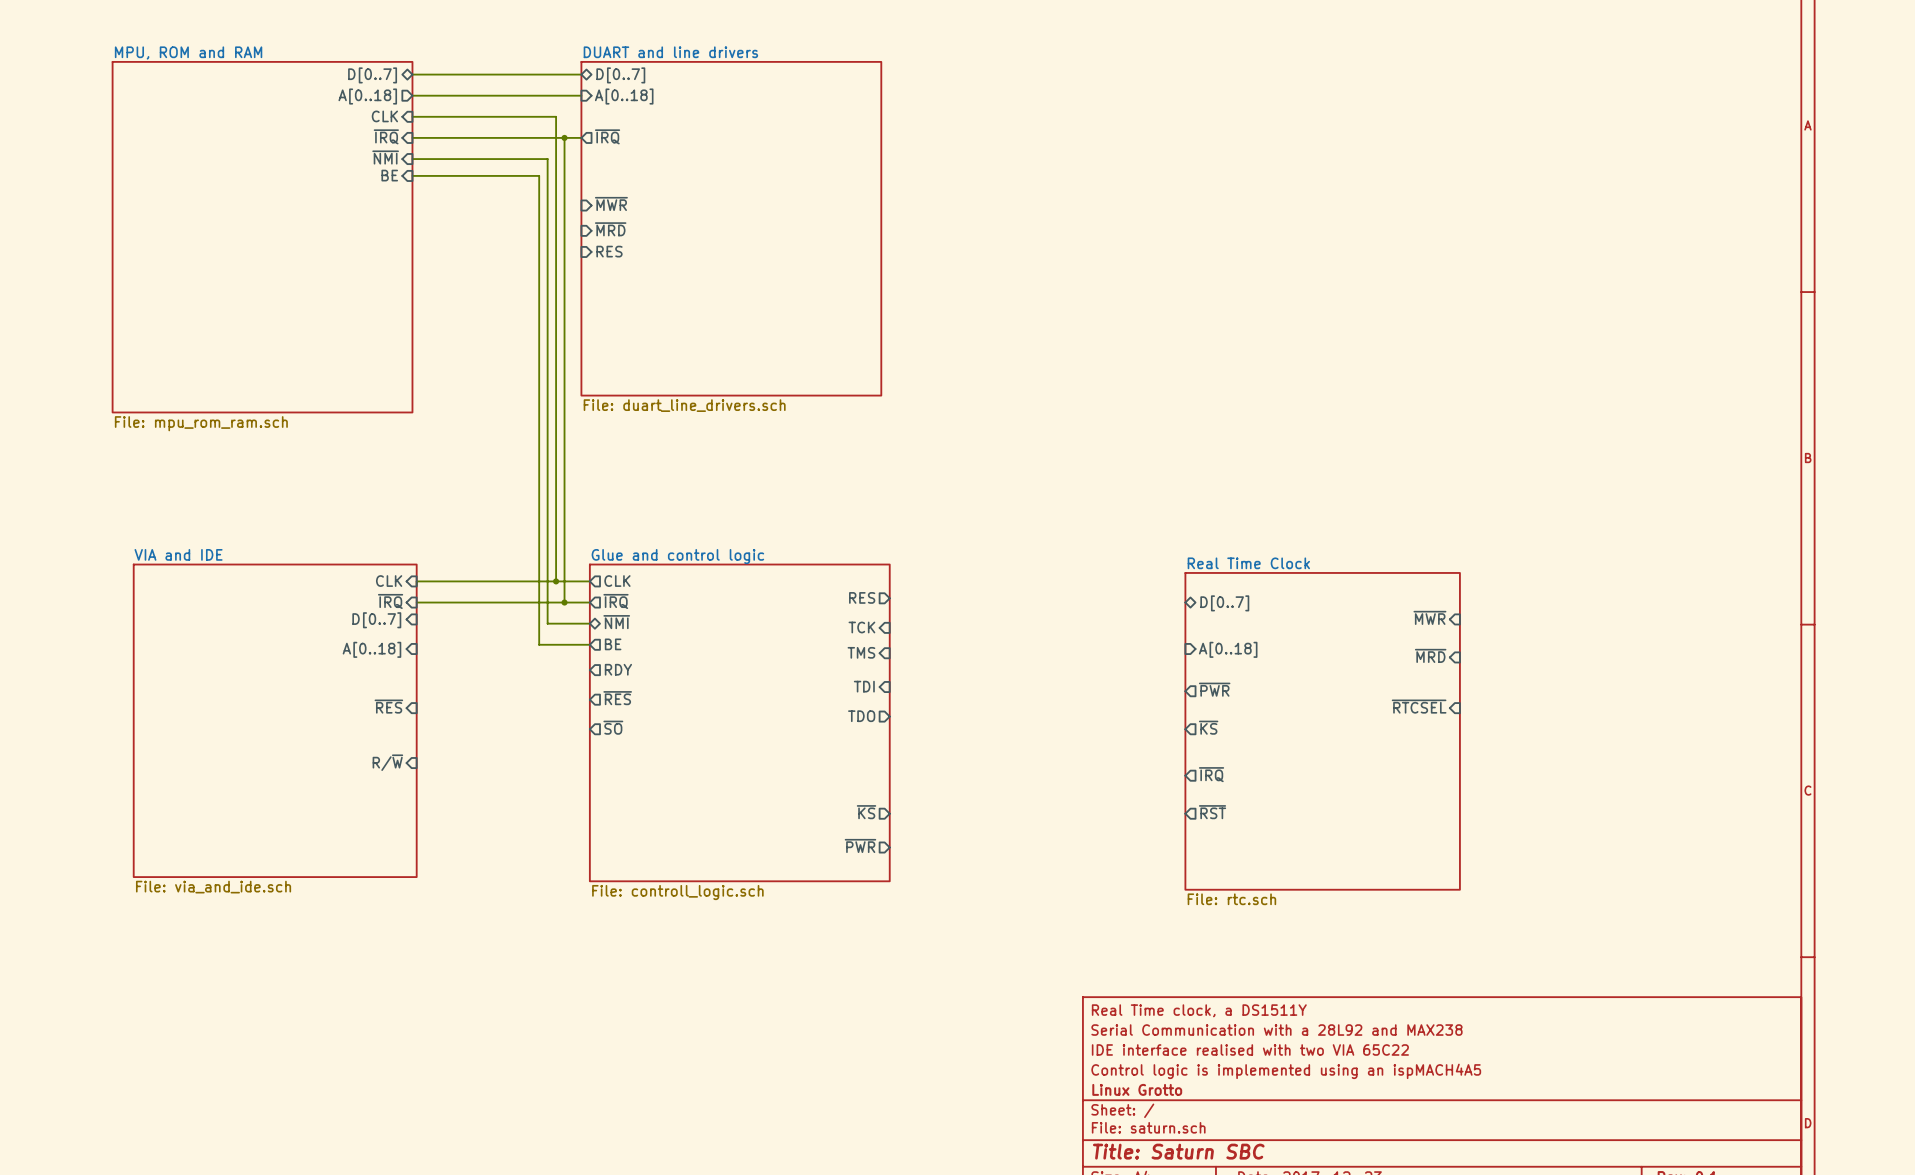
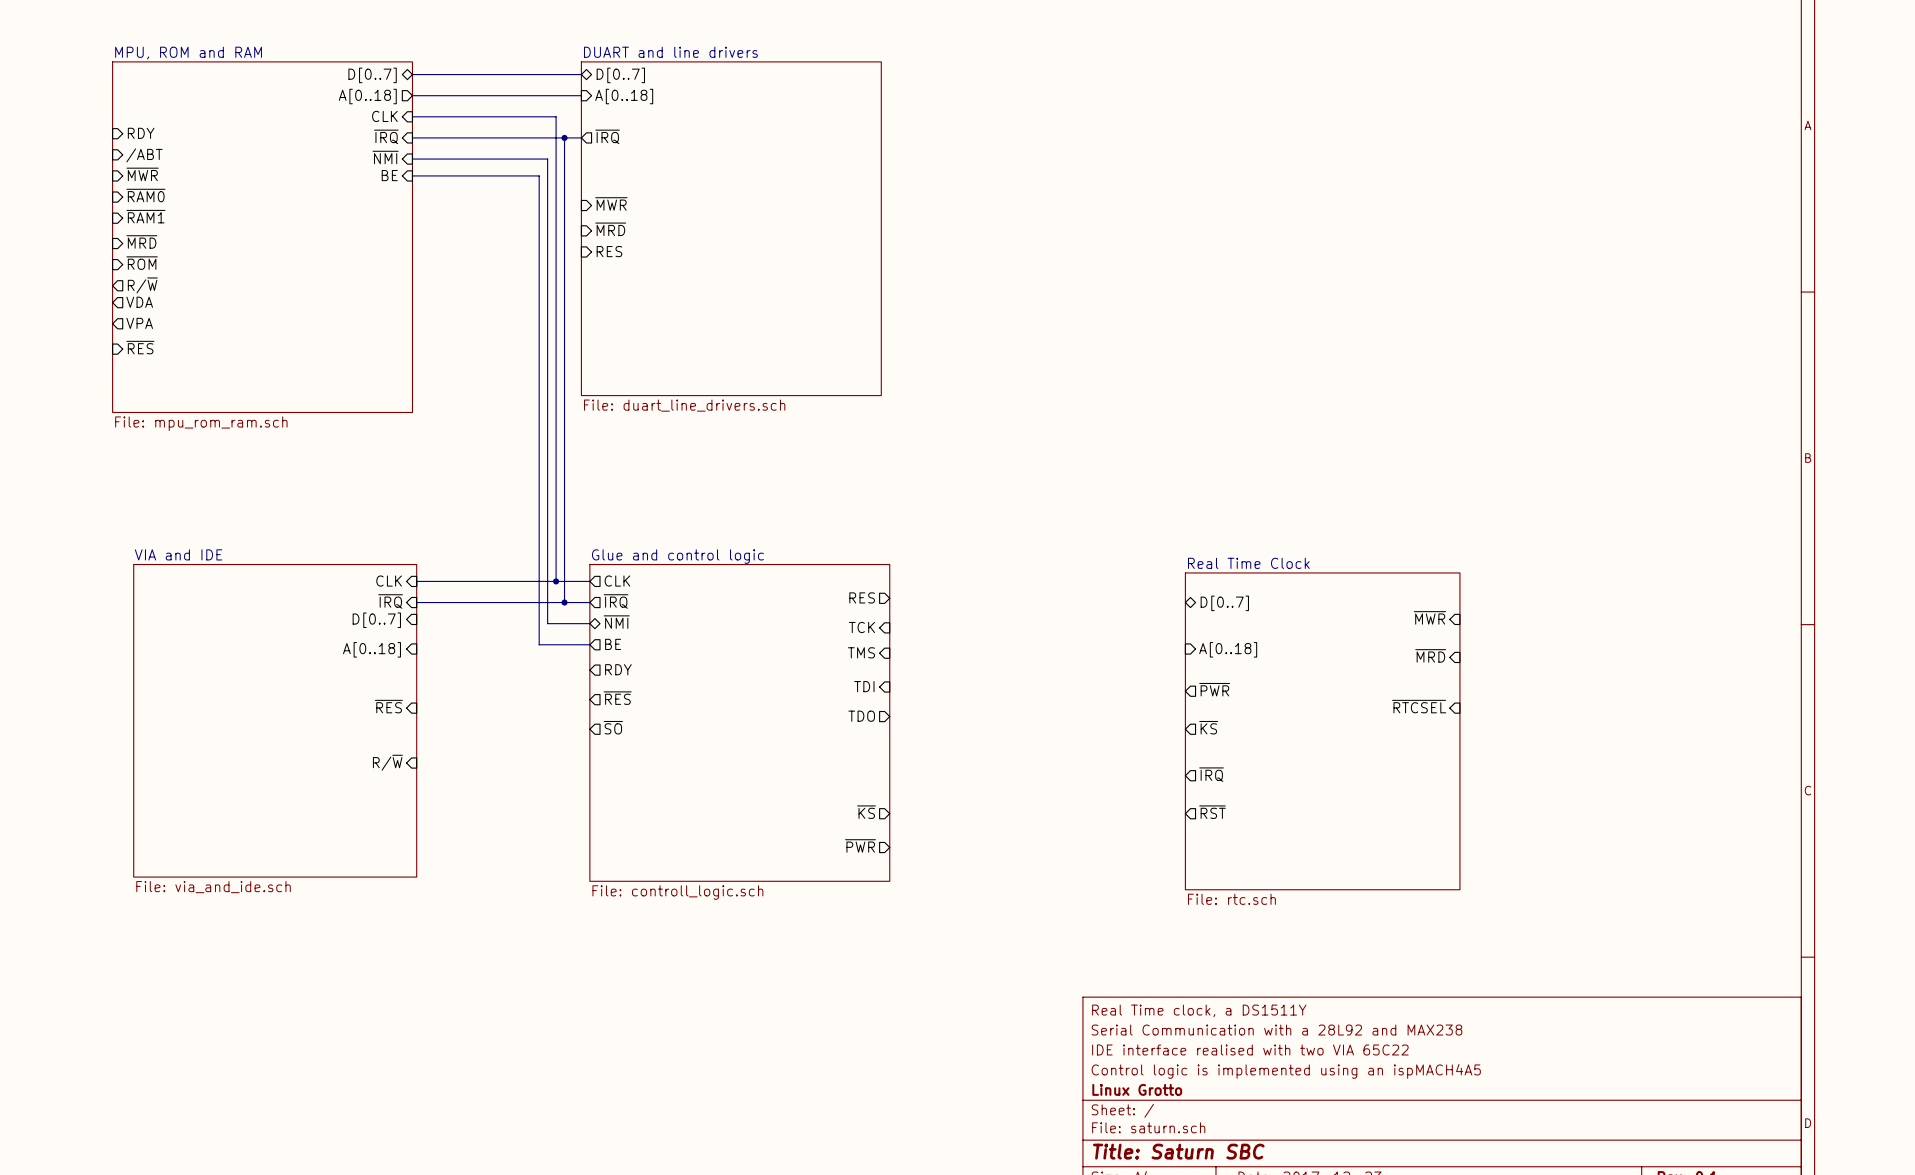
sheet pin: none -> RDY (141, 133)
sheet pin: none -> /ABT (144, 155)
sheet pin: none -> ~{MWR} (142, 174)
sheet pin: none -> ~{RAM0} (145, 195)
sheet pin: none -> ~{RAM1} (145, 216)
sheet pin: none -> ~{MRD} (141, 241)
sheet pin: none -> ~{ROM} (142, 263)
sheet pin: none -> R/~{W} (142, 285)
sheet pin: none -> VDA (139, 302)
sheet pin: none -> VPA (139, 323)
sheet pin: none -> ~{RES} (140, 347)

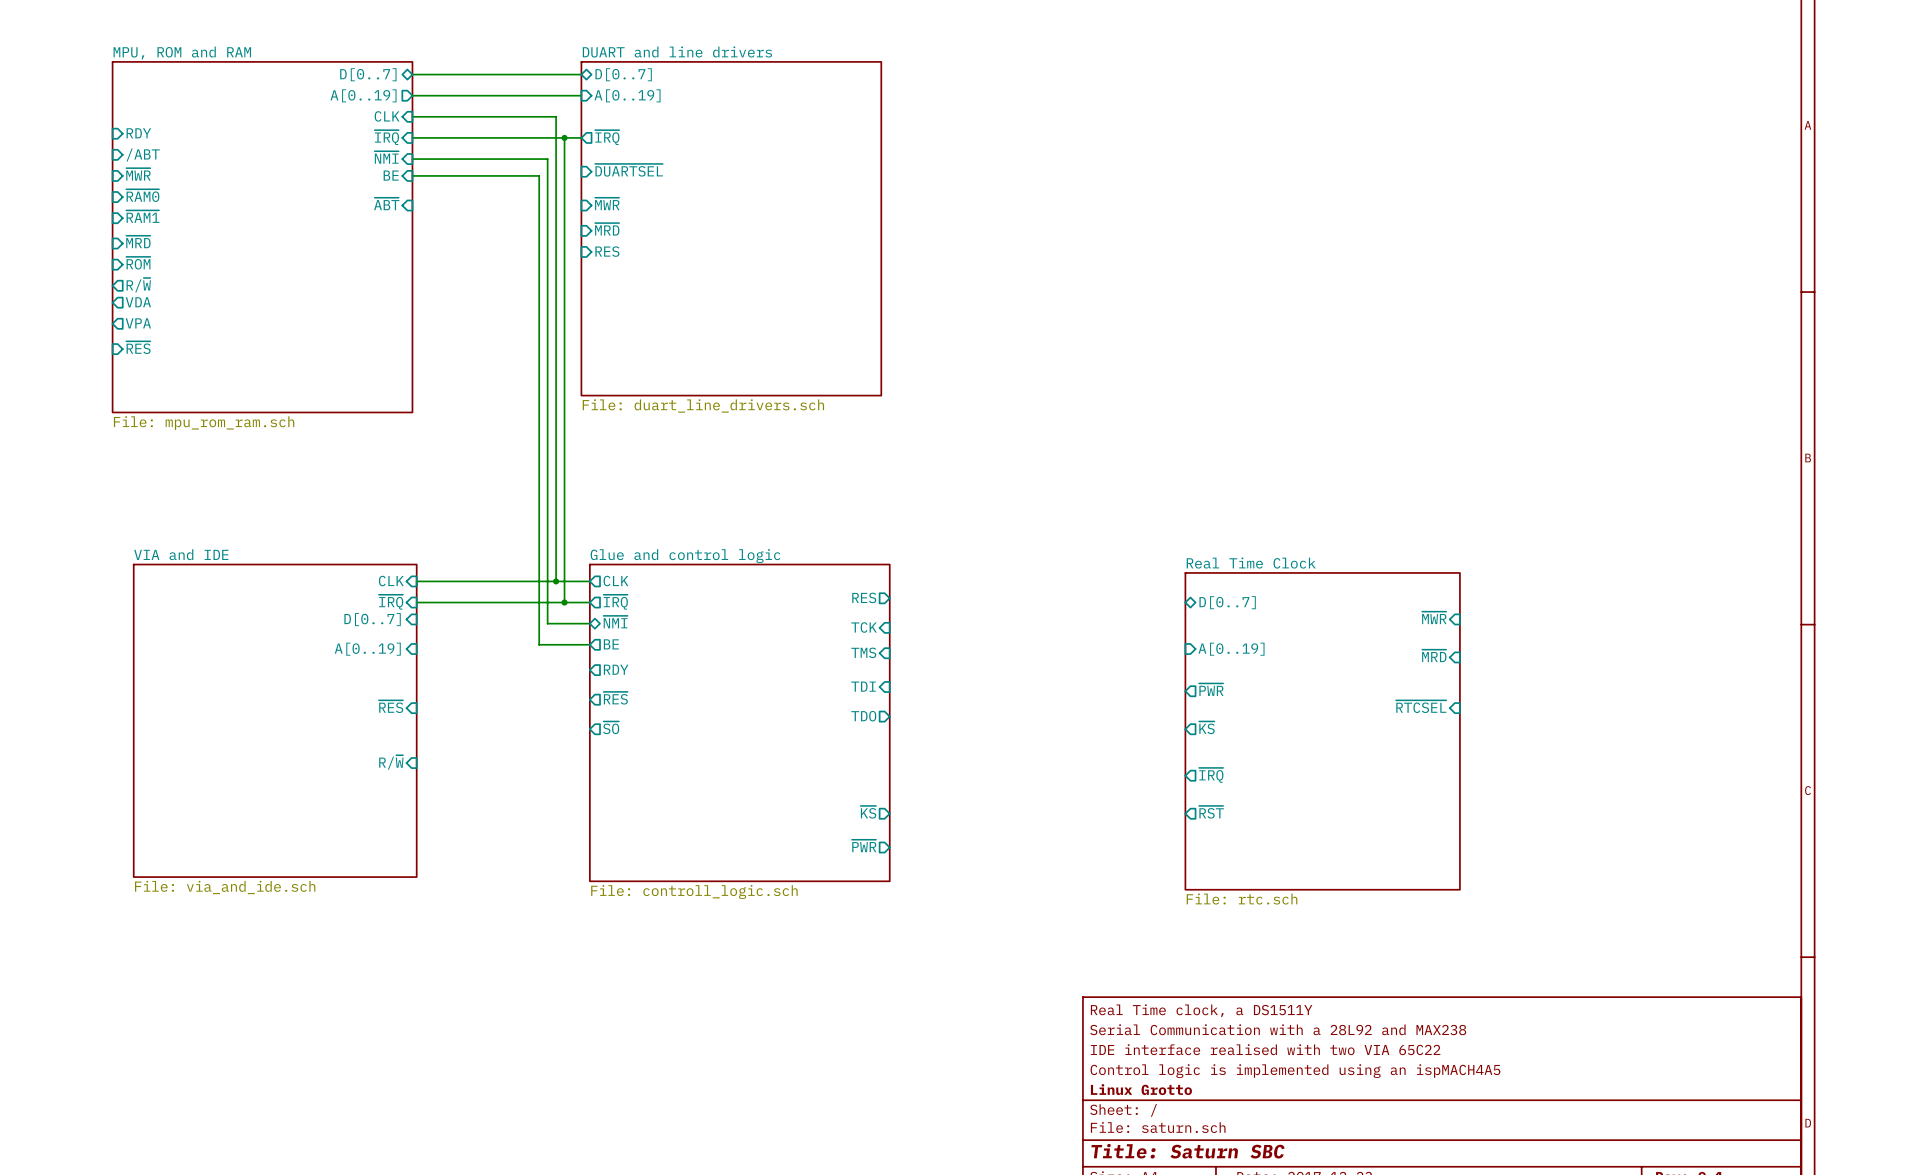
sheet pin: A[0..18] (367, 96) -> A[0..19] (363, 95)
sheet pin: A[0..18] (624, 96) -> A[0..19] (627, 95)
sheet pin: none -> ~{DUARTSEL} (628, 170)
sheet pin: none -> ~{ABT} (386, 203)
sheet pin: A[0..18] (371, 649) -> A[0..19] (367, 649)
sheet pin: A[0..18] (1228, 649) -> A[0..19] (1231, 649)

